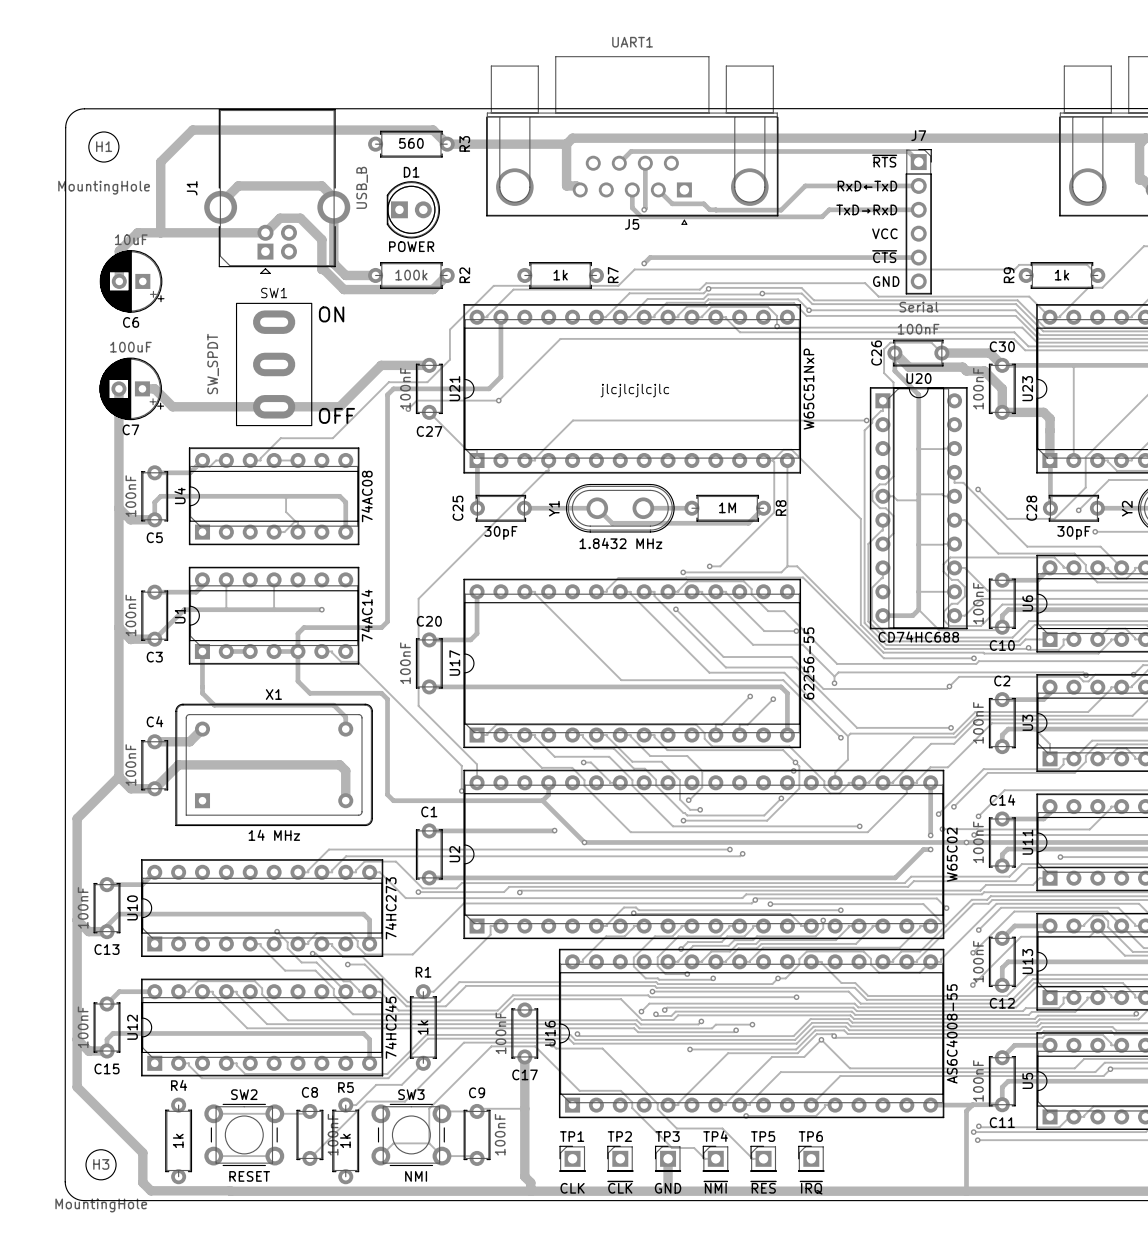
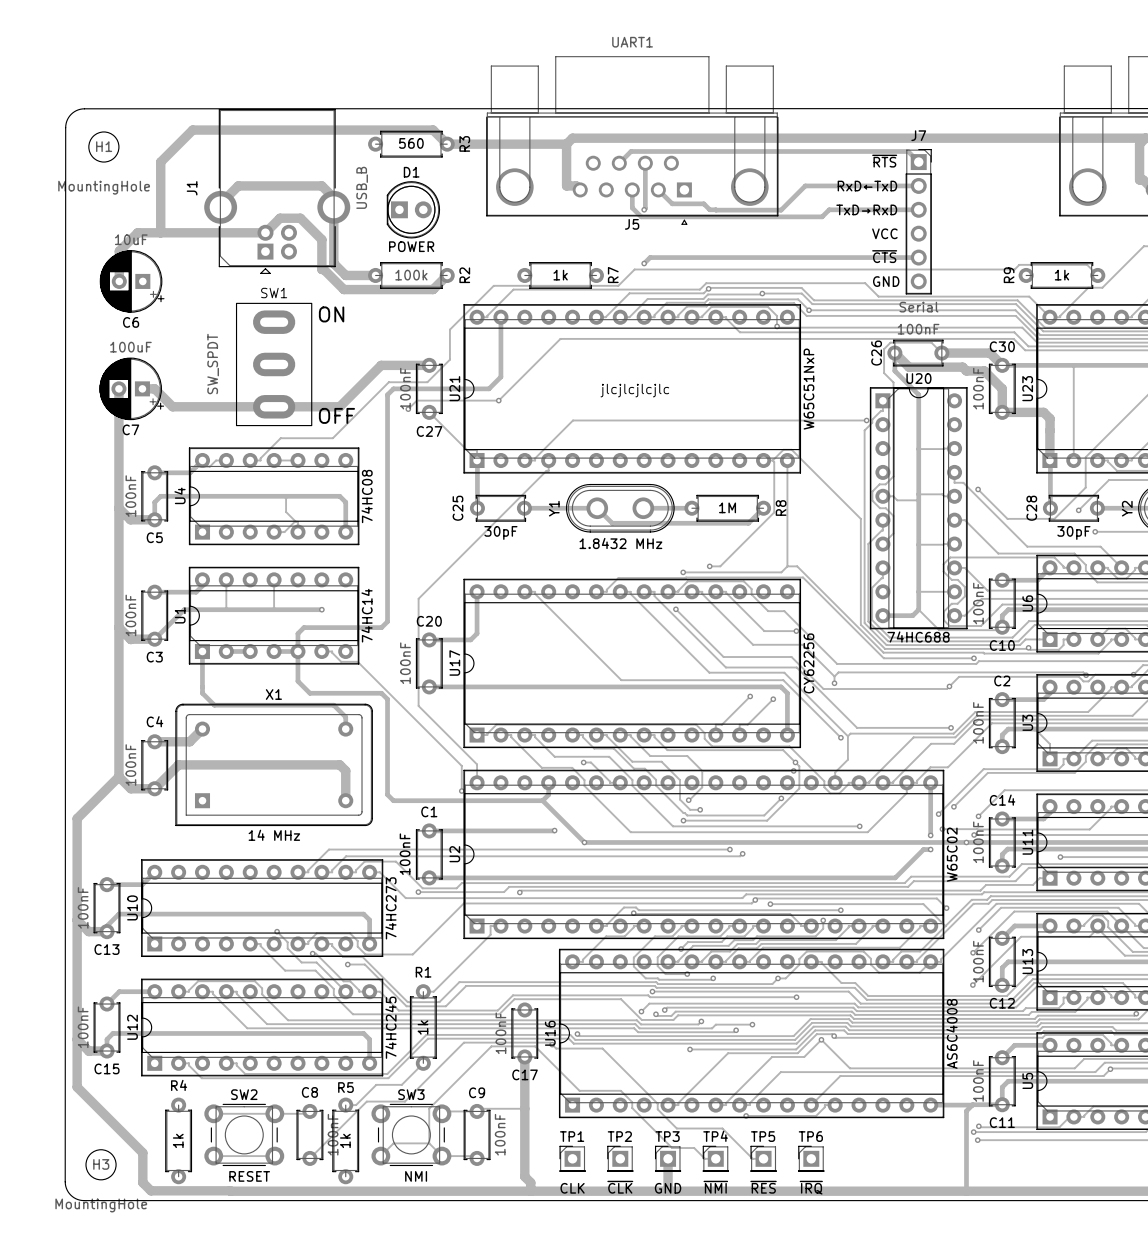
U4 value: 74AC08 (367, 496) -> 74HC08 (367, 496)
U1 value: 74AC14 (367, 615) -> 74HC14 (367, 615)
U20 value: CD74HC688 (918, 637) -> 74HC688 (918, 637)
U17 value: 62256-55 (808, 663) -> CY62256 (808, 663)
C1 value: none -> 100nF (405, 854)
U16 value: AS6C4008-55 (951, 1033) -> AS6C4008 (951, 1033)

